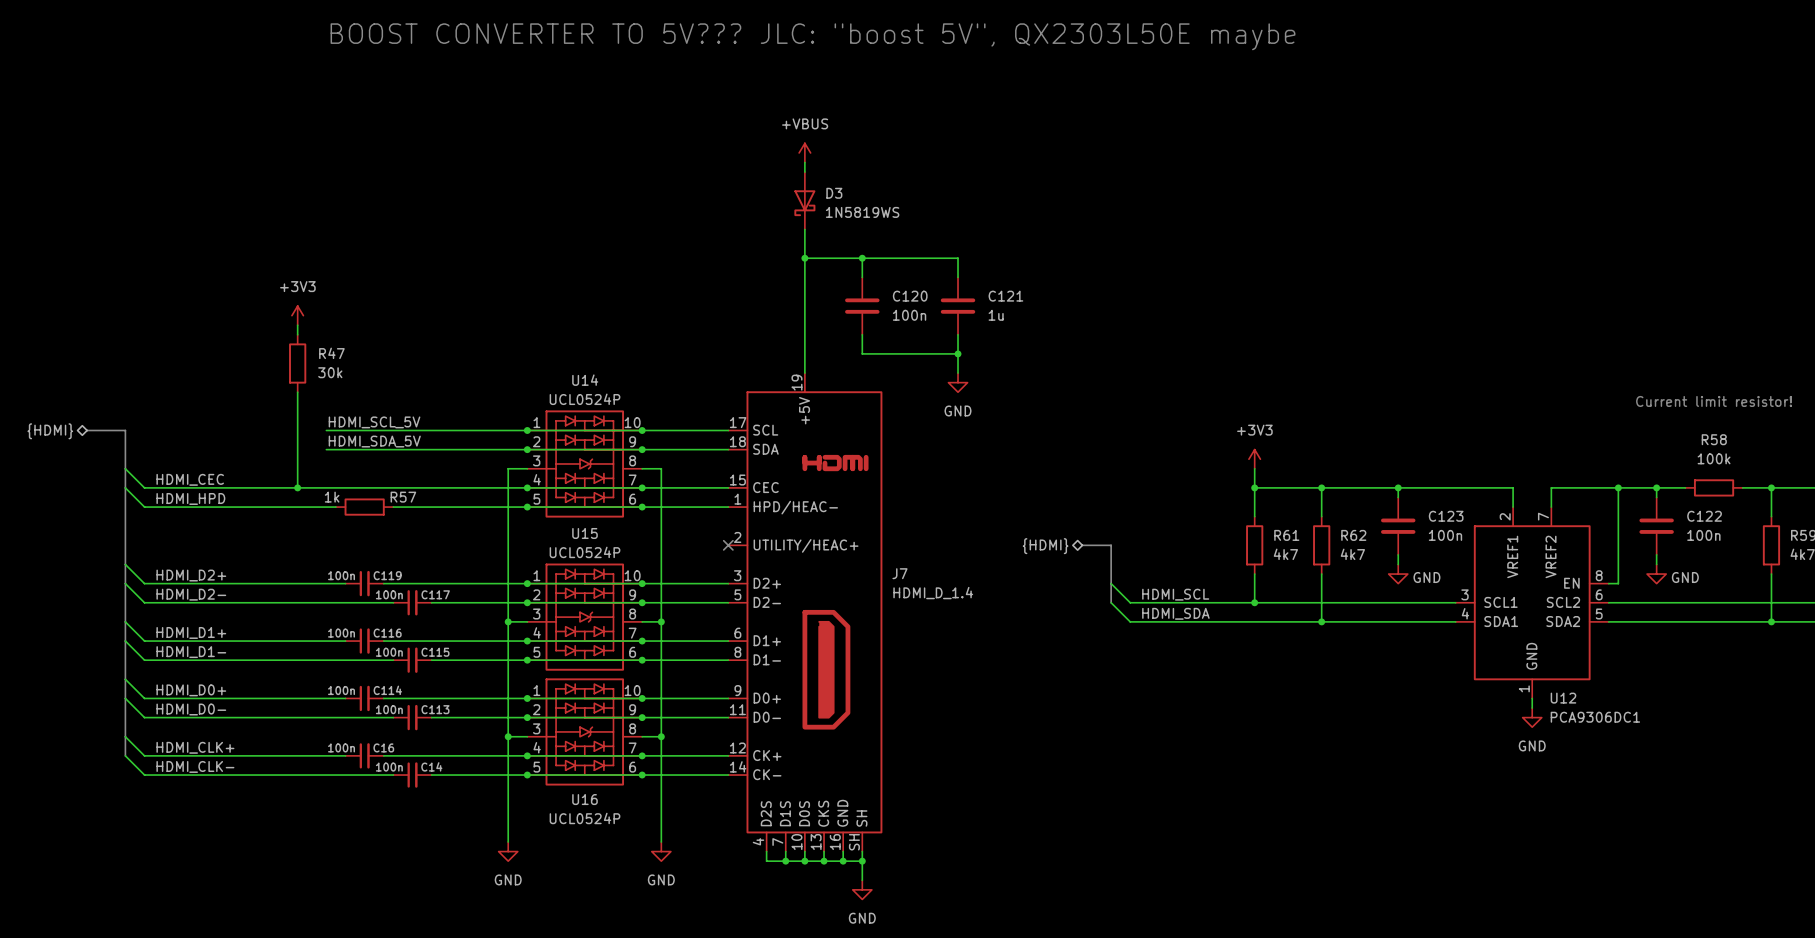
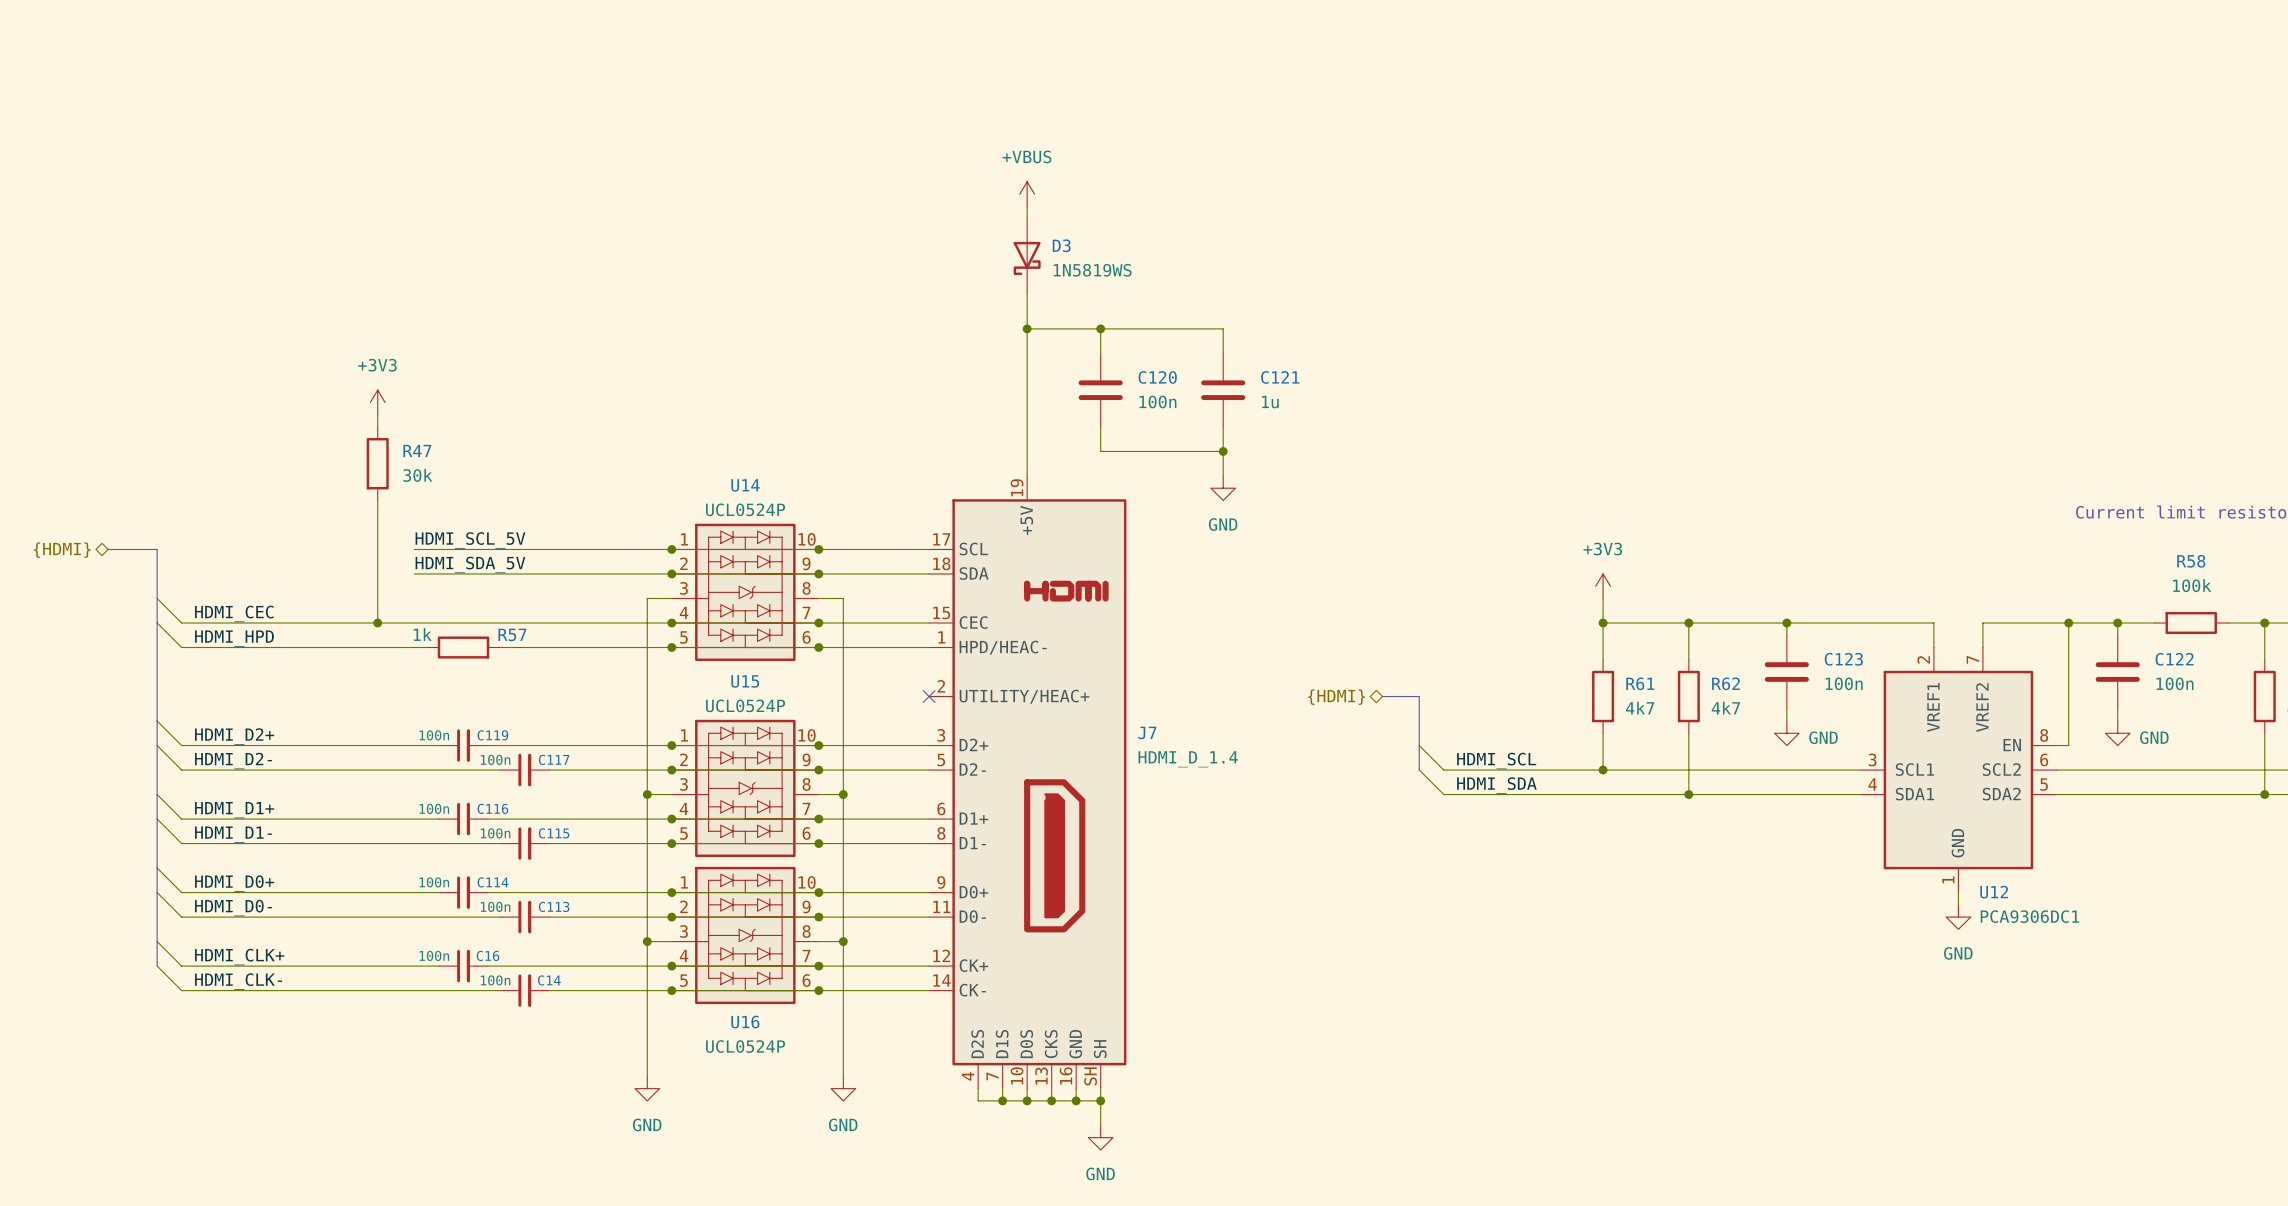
text: BOOST CONVERTER TO 5V??? JLC: "boost 5V", QX2303L50E maybe (812, 36) -> none

